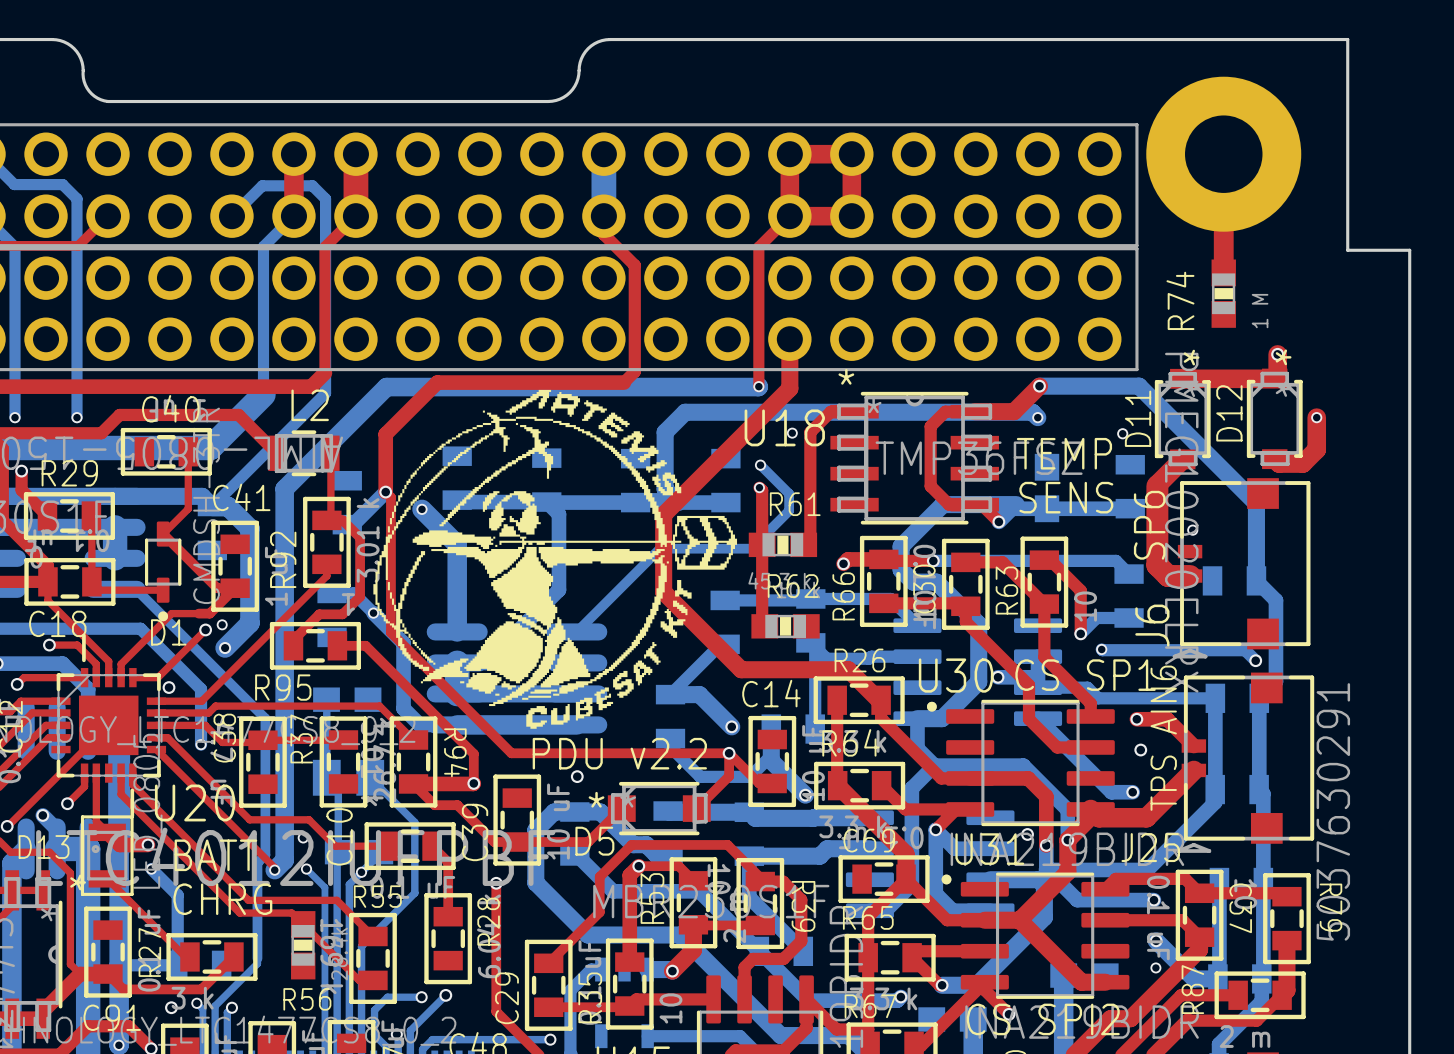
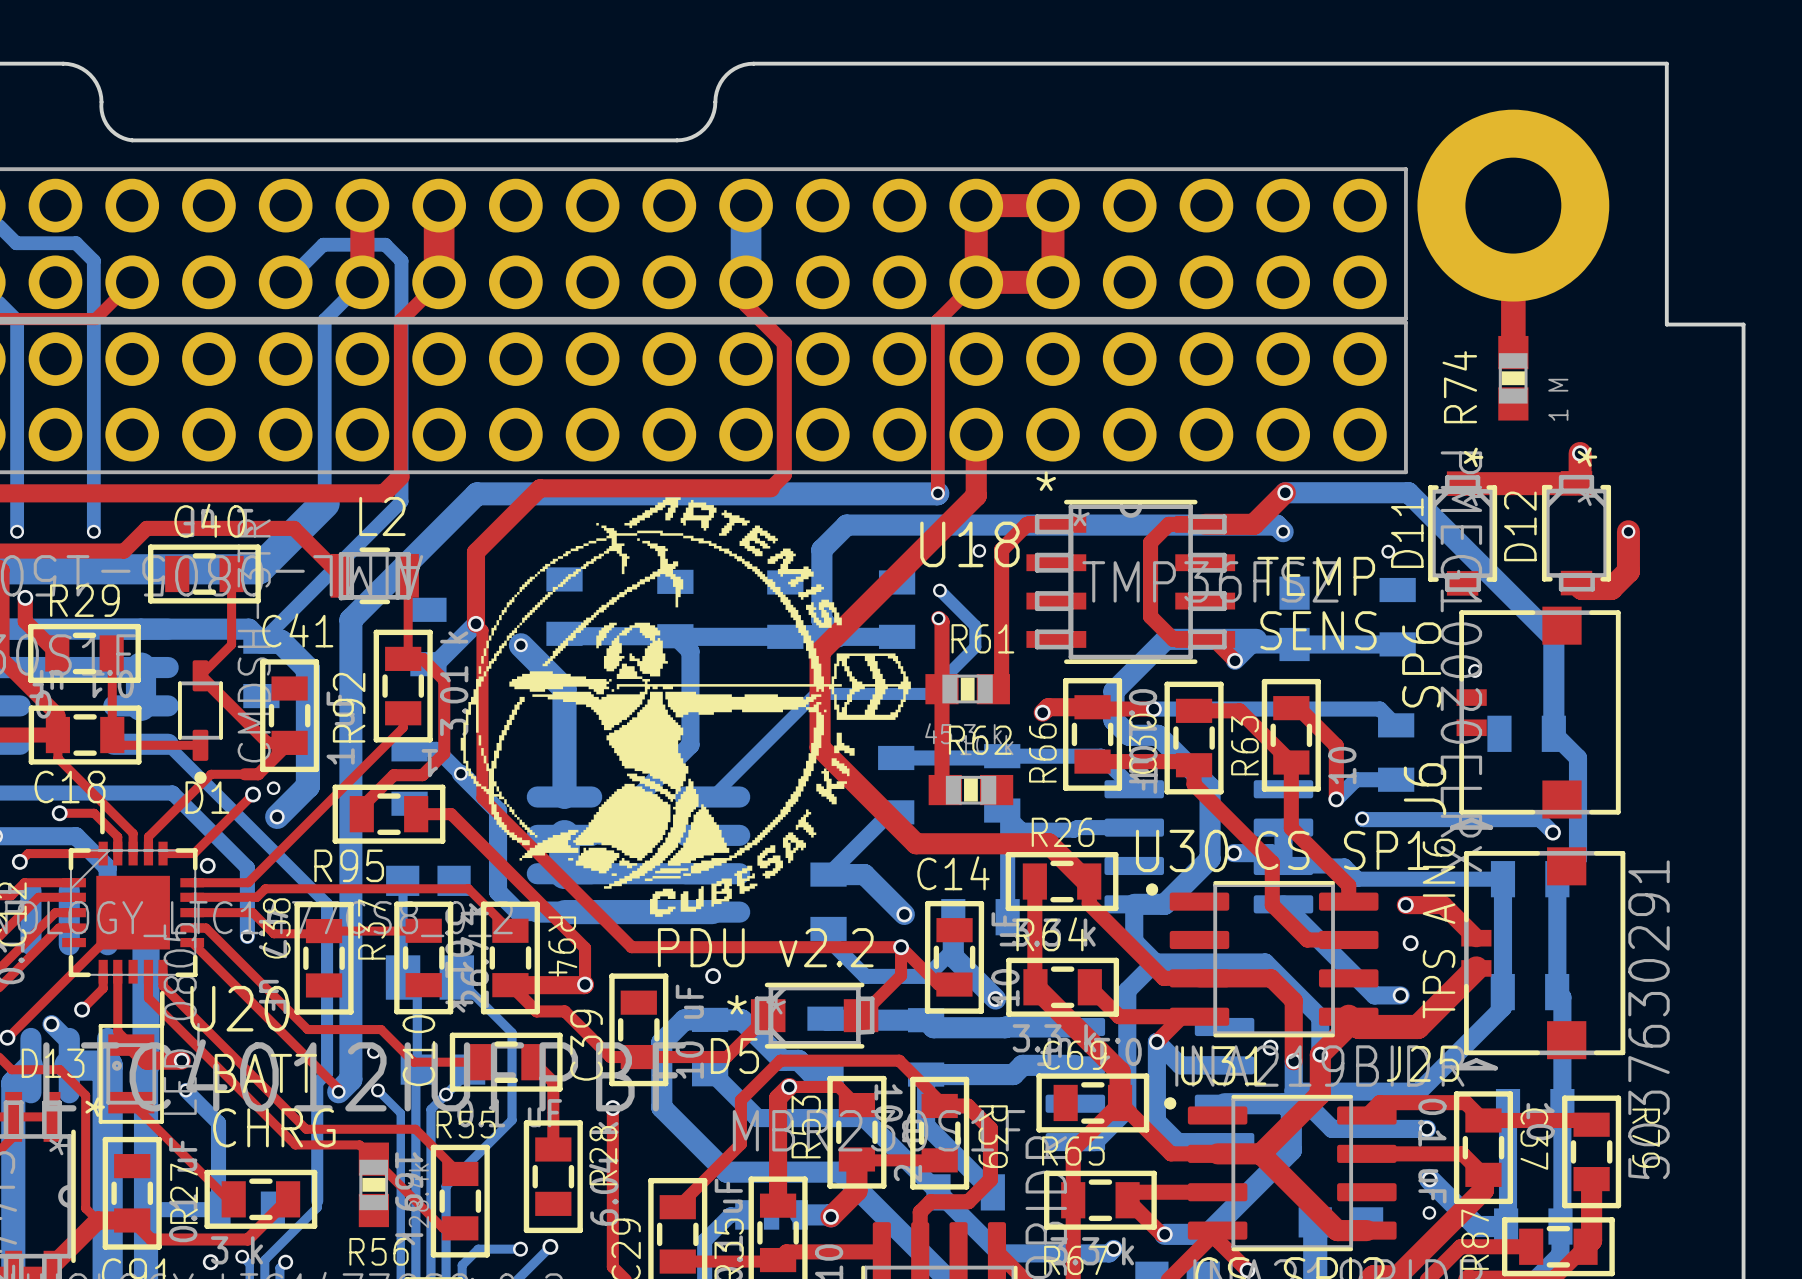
top track: (1182, 459) (1157, 484) (1157, 565) (1168, 576) (1190, 576) -> none

